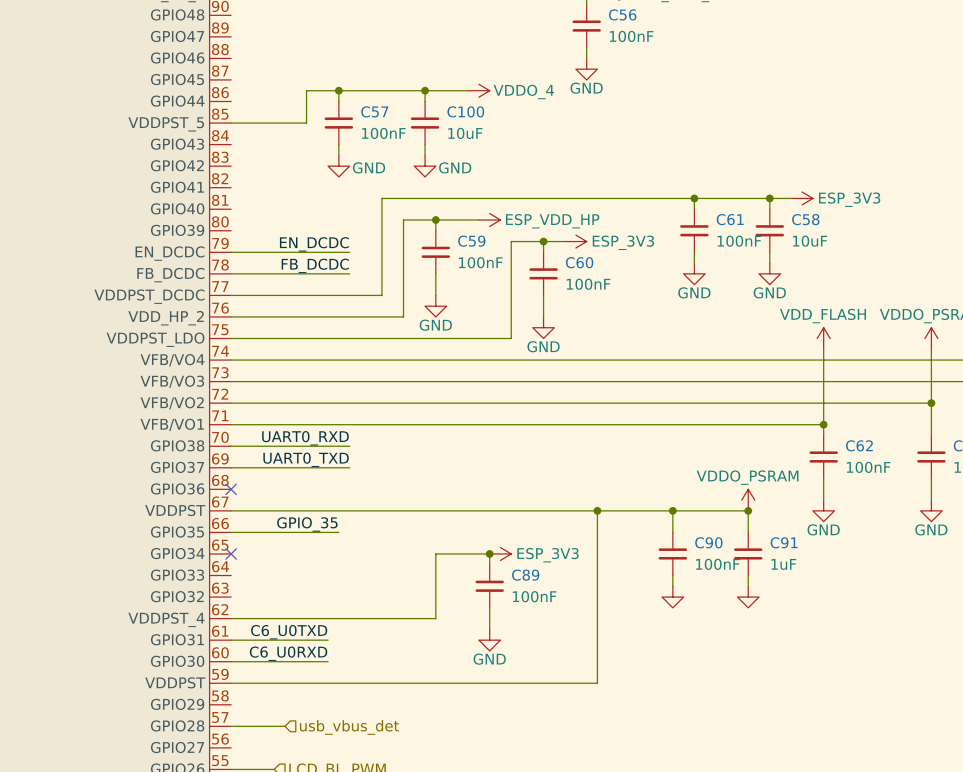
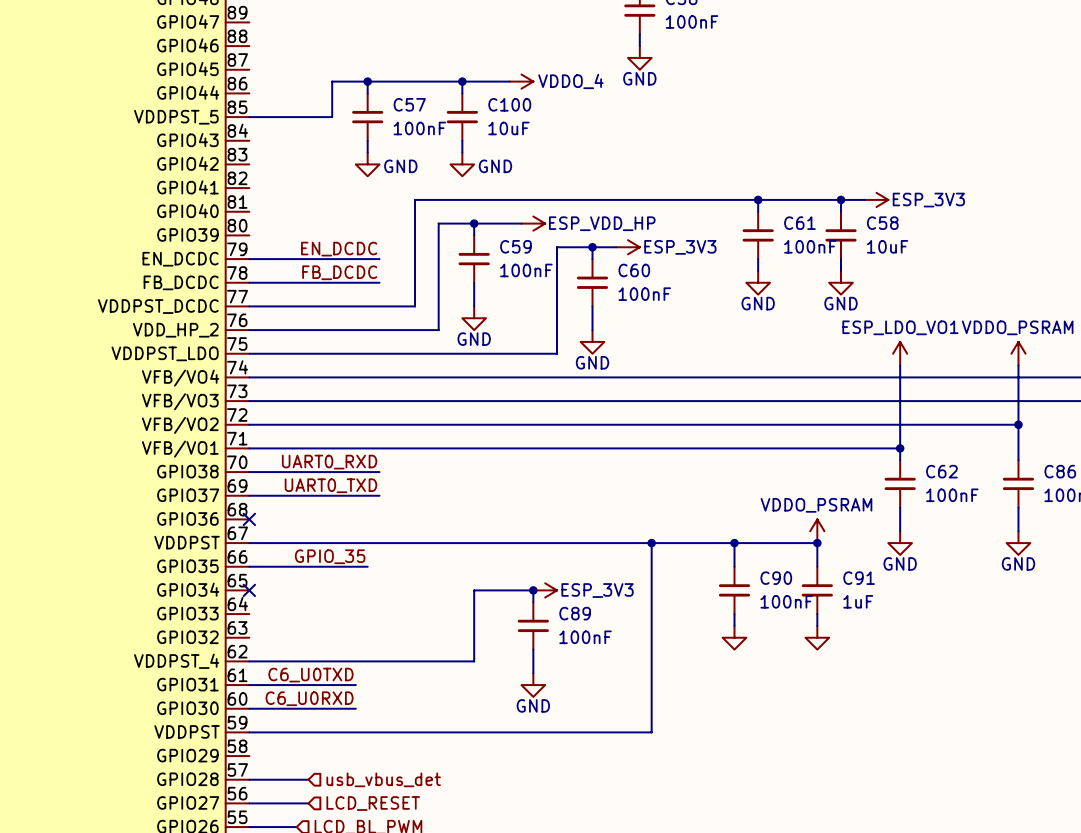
power symbol: VDD_FLASH (823, 338) -> ESP_LDO_VO1 (900, 353)
wire: none -> (249, 803) (308, 803)
hierarchical label: none -> LCD_RESET (373, 803)

